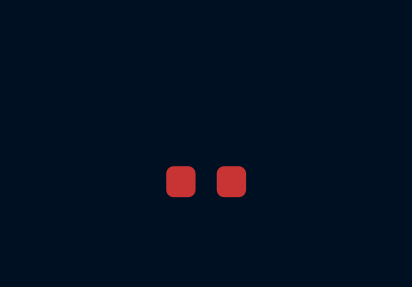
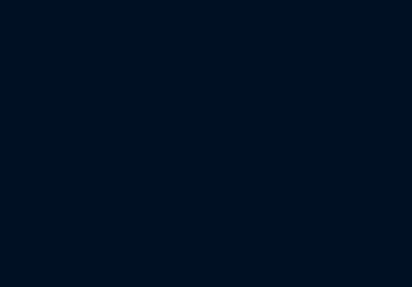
part: (206, 181) -> none

